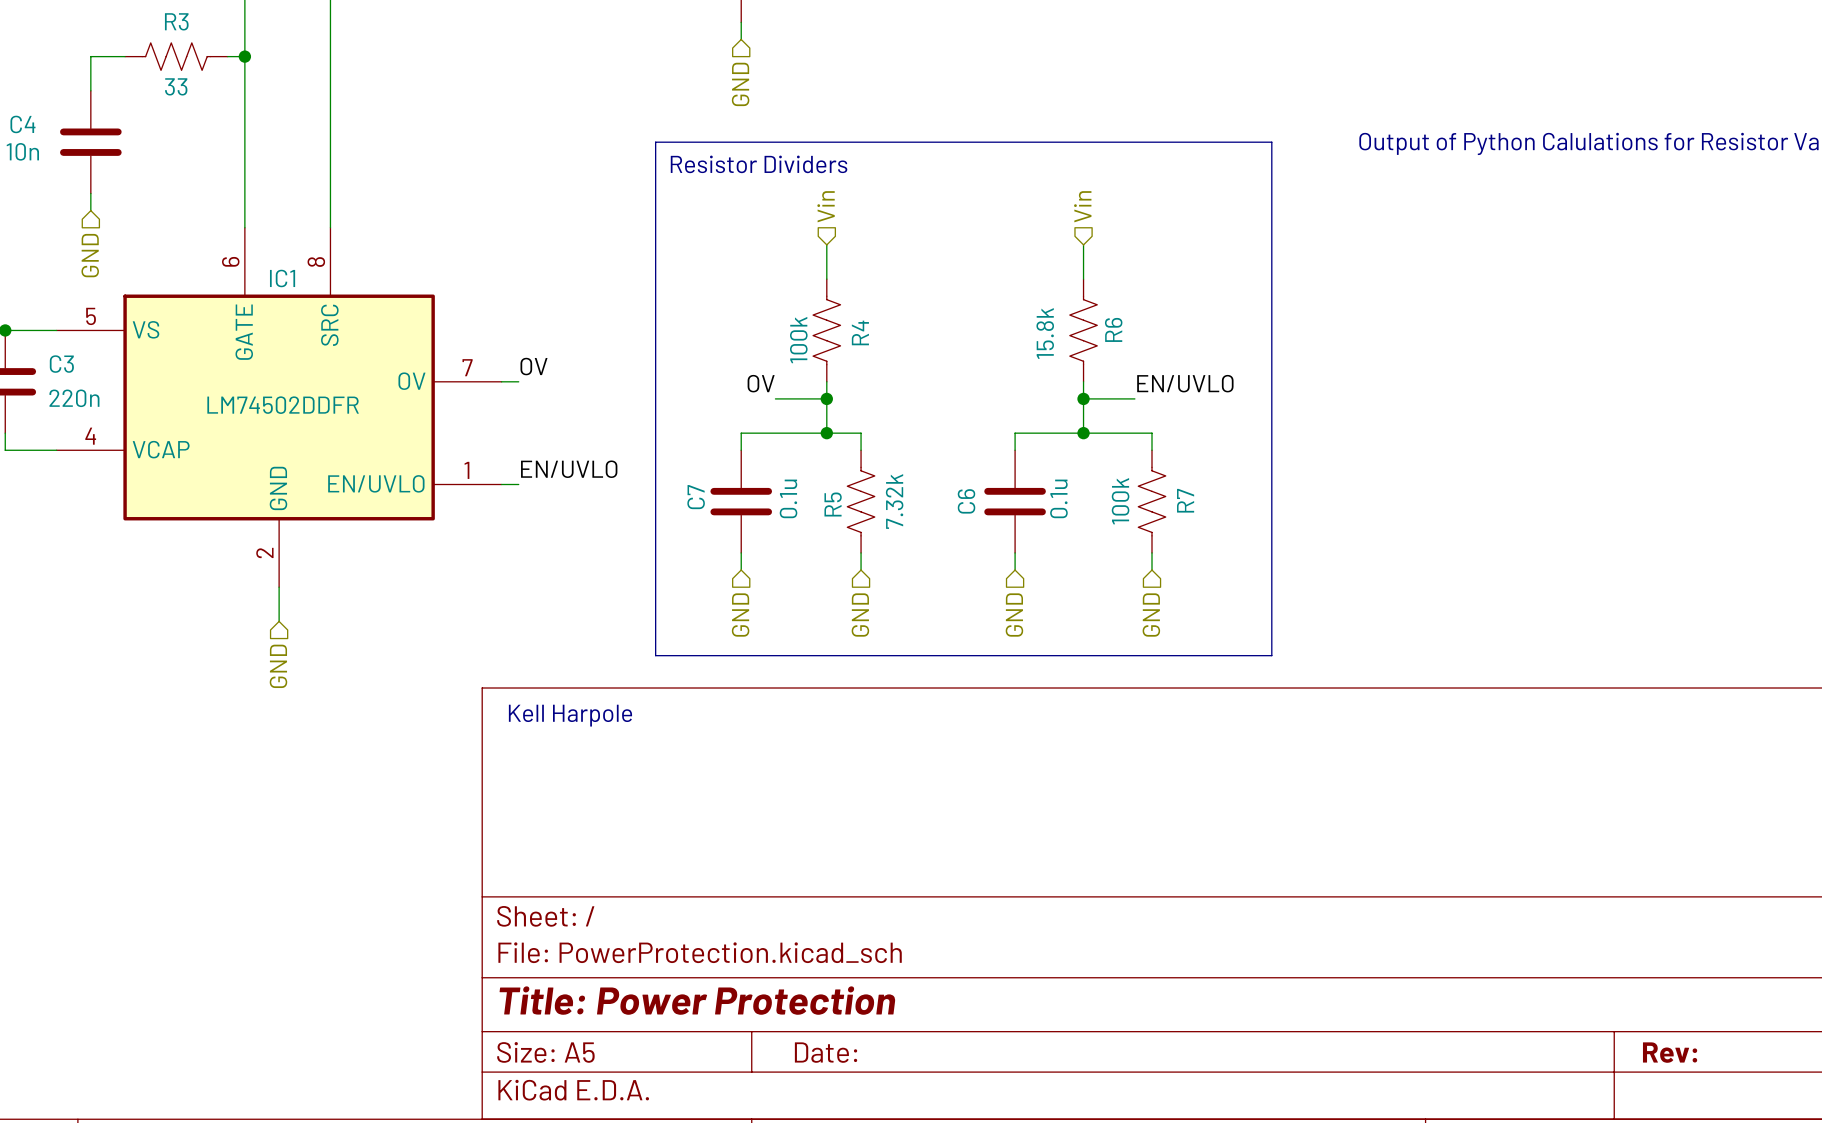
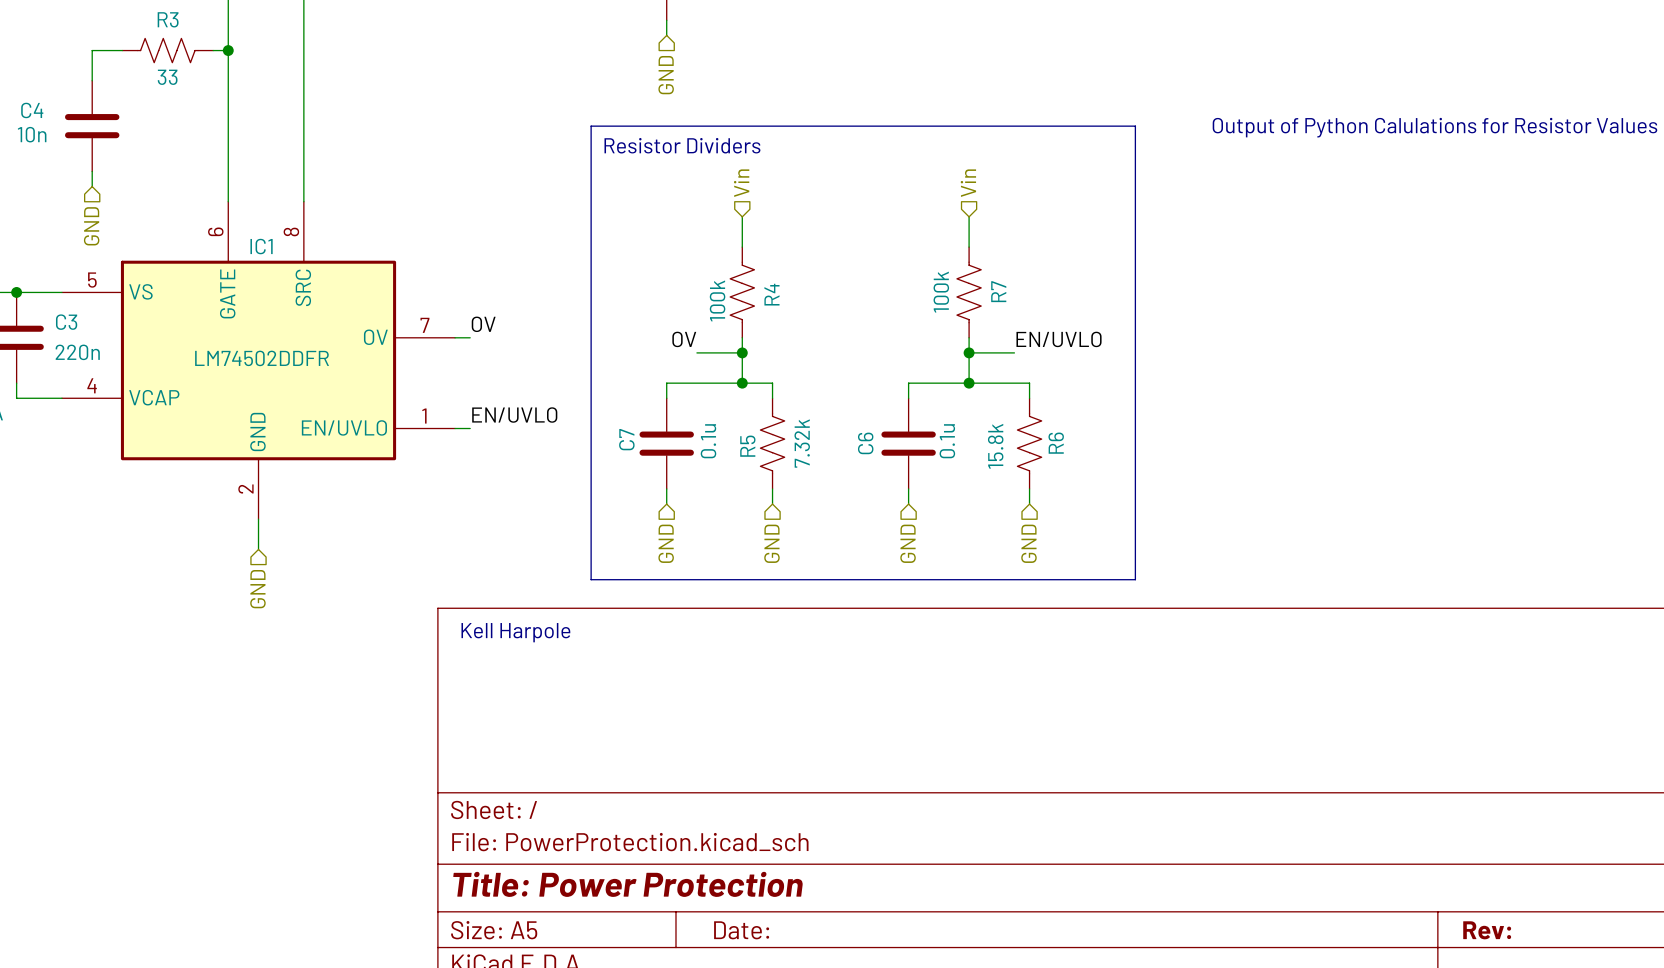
R6 name: R6 (1113, 329) -> R7 (998, 291)
R6 value: 15.8k (1045, 333) -> 100k (941, 292)
R7 name: R7 (1185, 500) -> R6 (1056, 443)
R7 value: 100k (1120, 501) -> 15.8k (995, 446)

